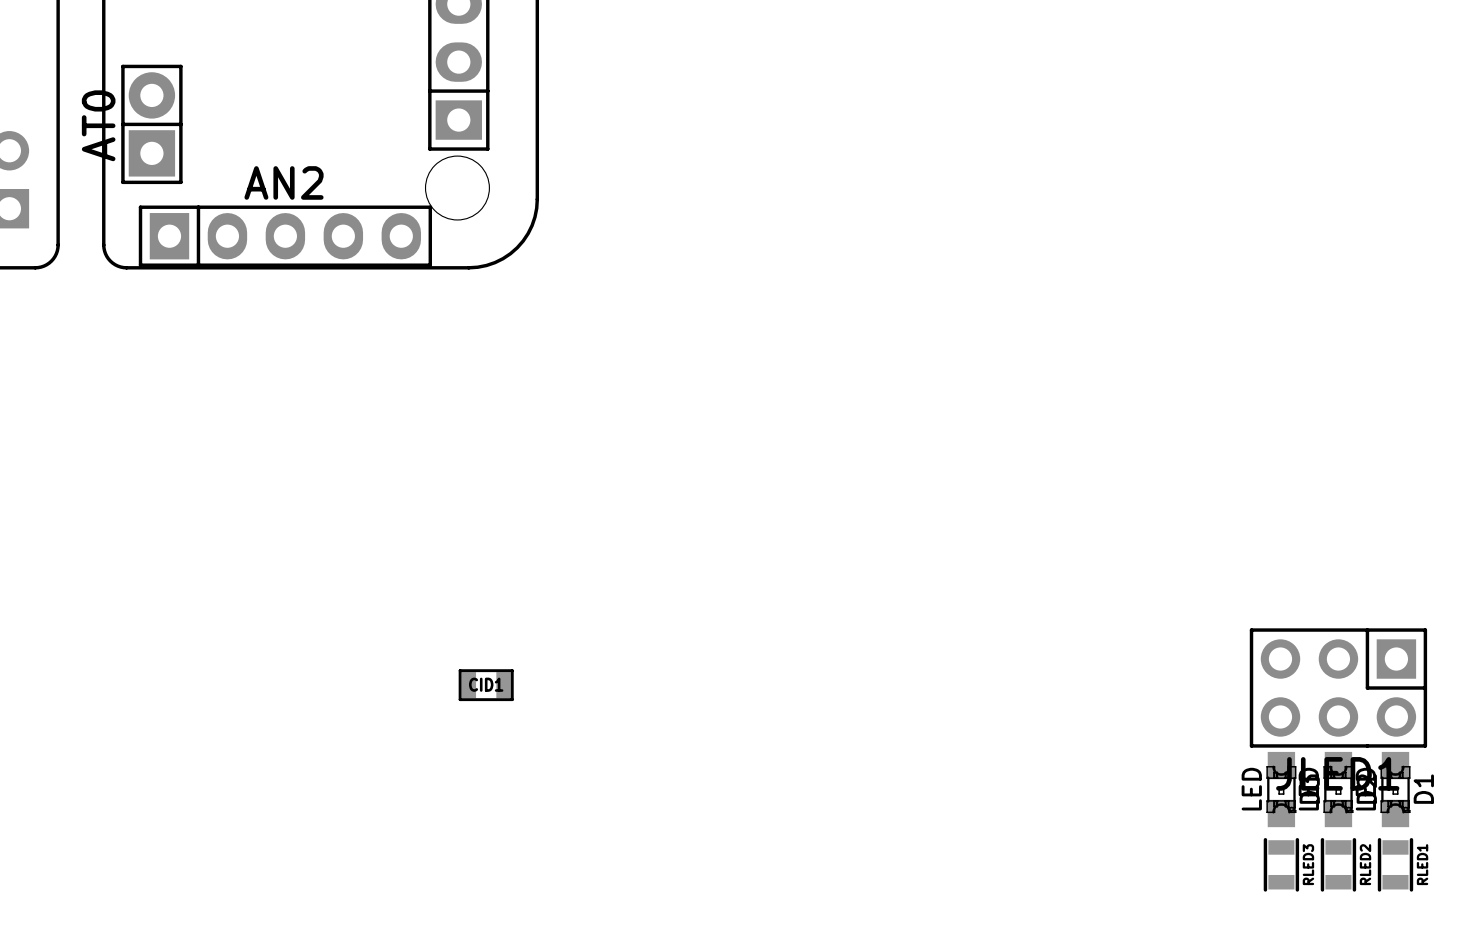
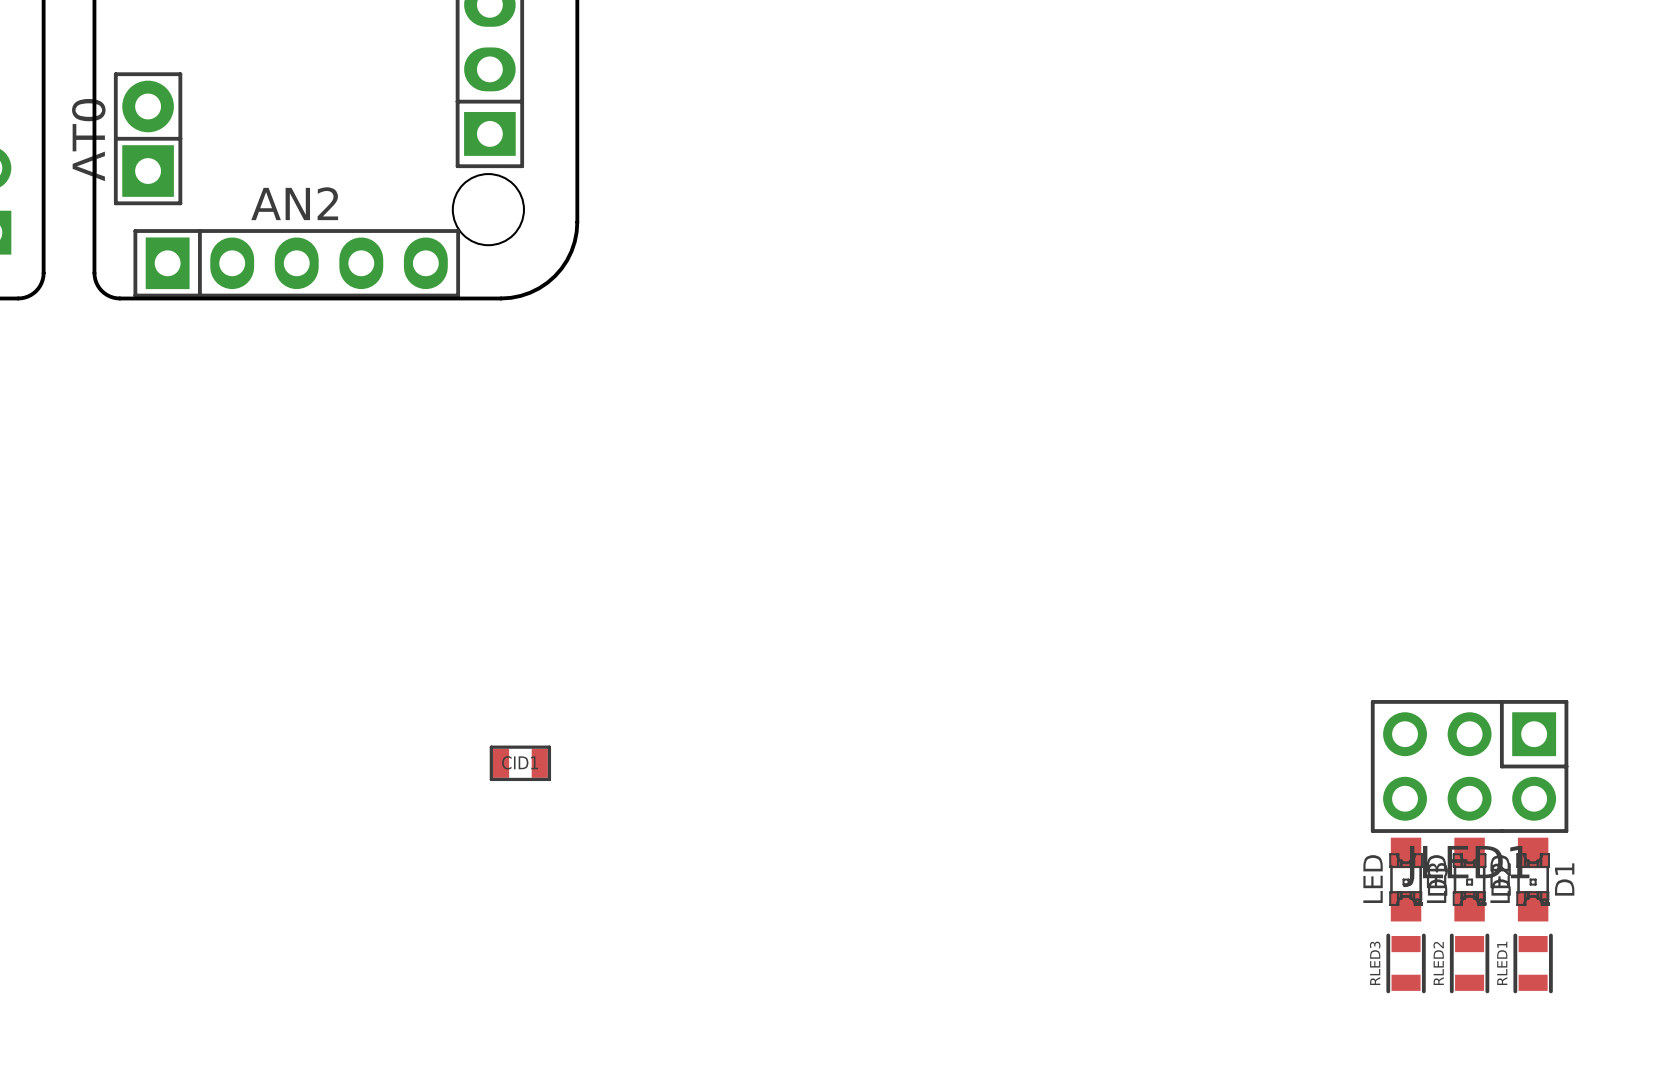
RLED3 name position: RLED3 (1308, 864) -> RLED3 (1375, 963)
RLED2 name position: RLED2 (1365, 864) -> RLED2 (1438, 963)
RLED1 name position: RLED1 (1422, 864) -> RLED1 (1502, 963)

